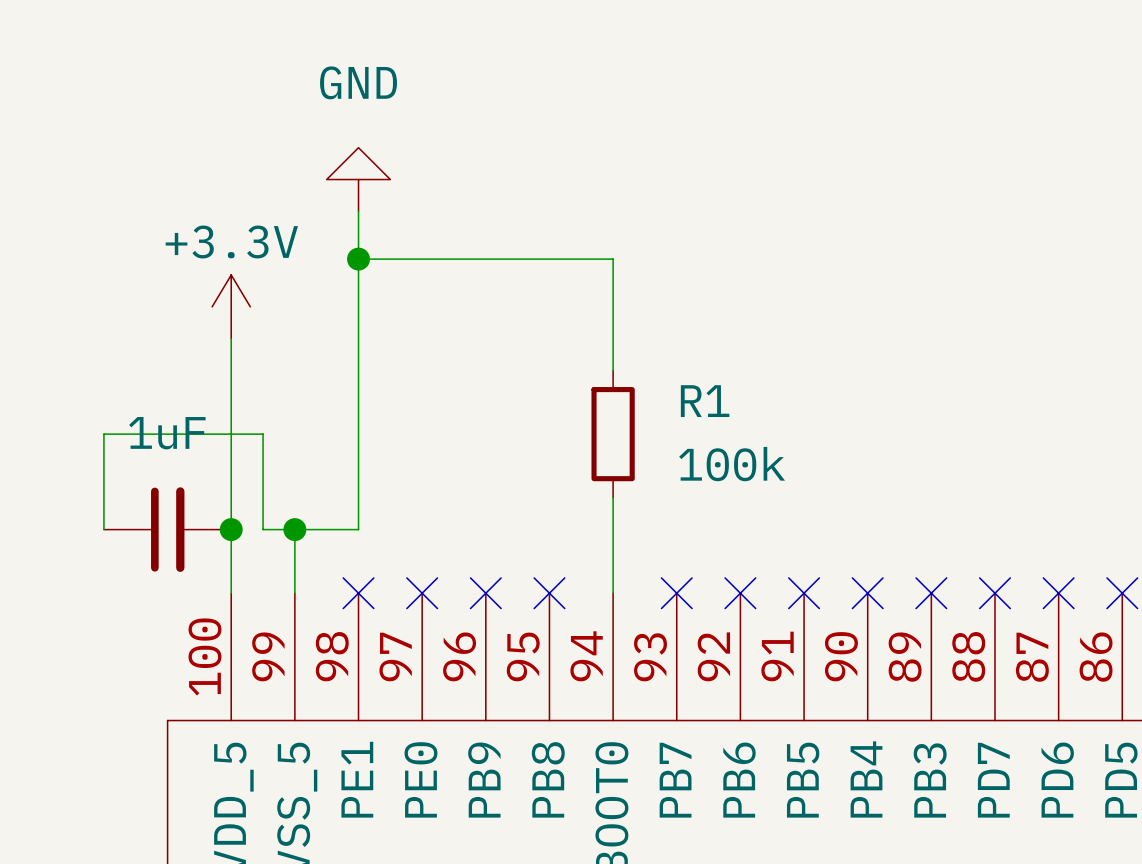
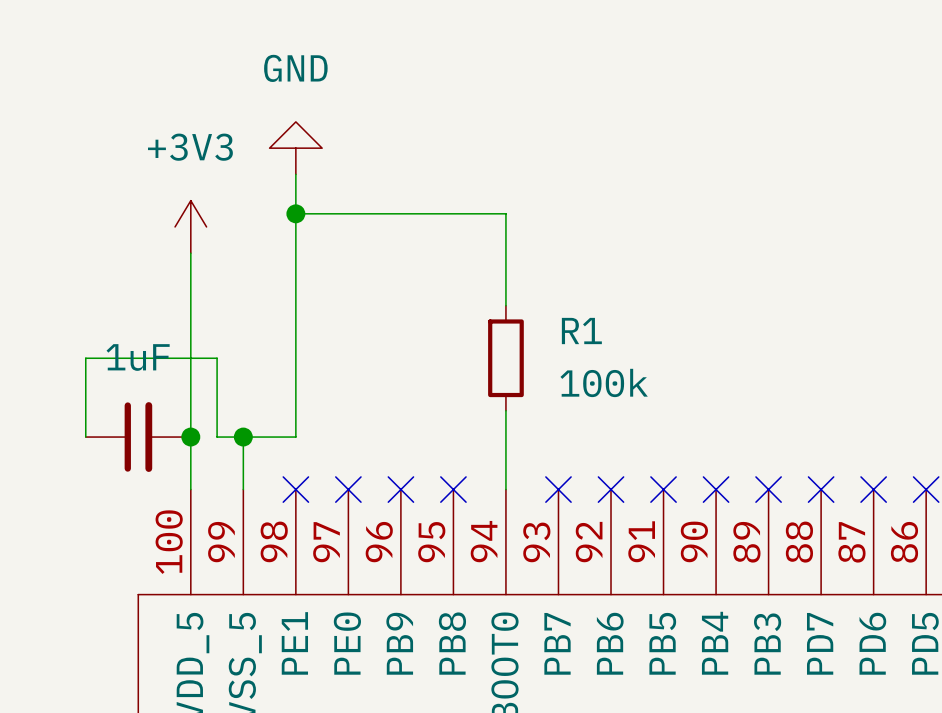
power symbol: none -> +3V3 (190, 226)
power symbol: +3.3V (231, 306) -> none

